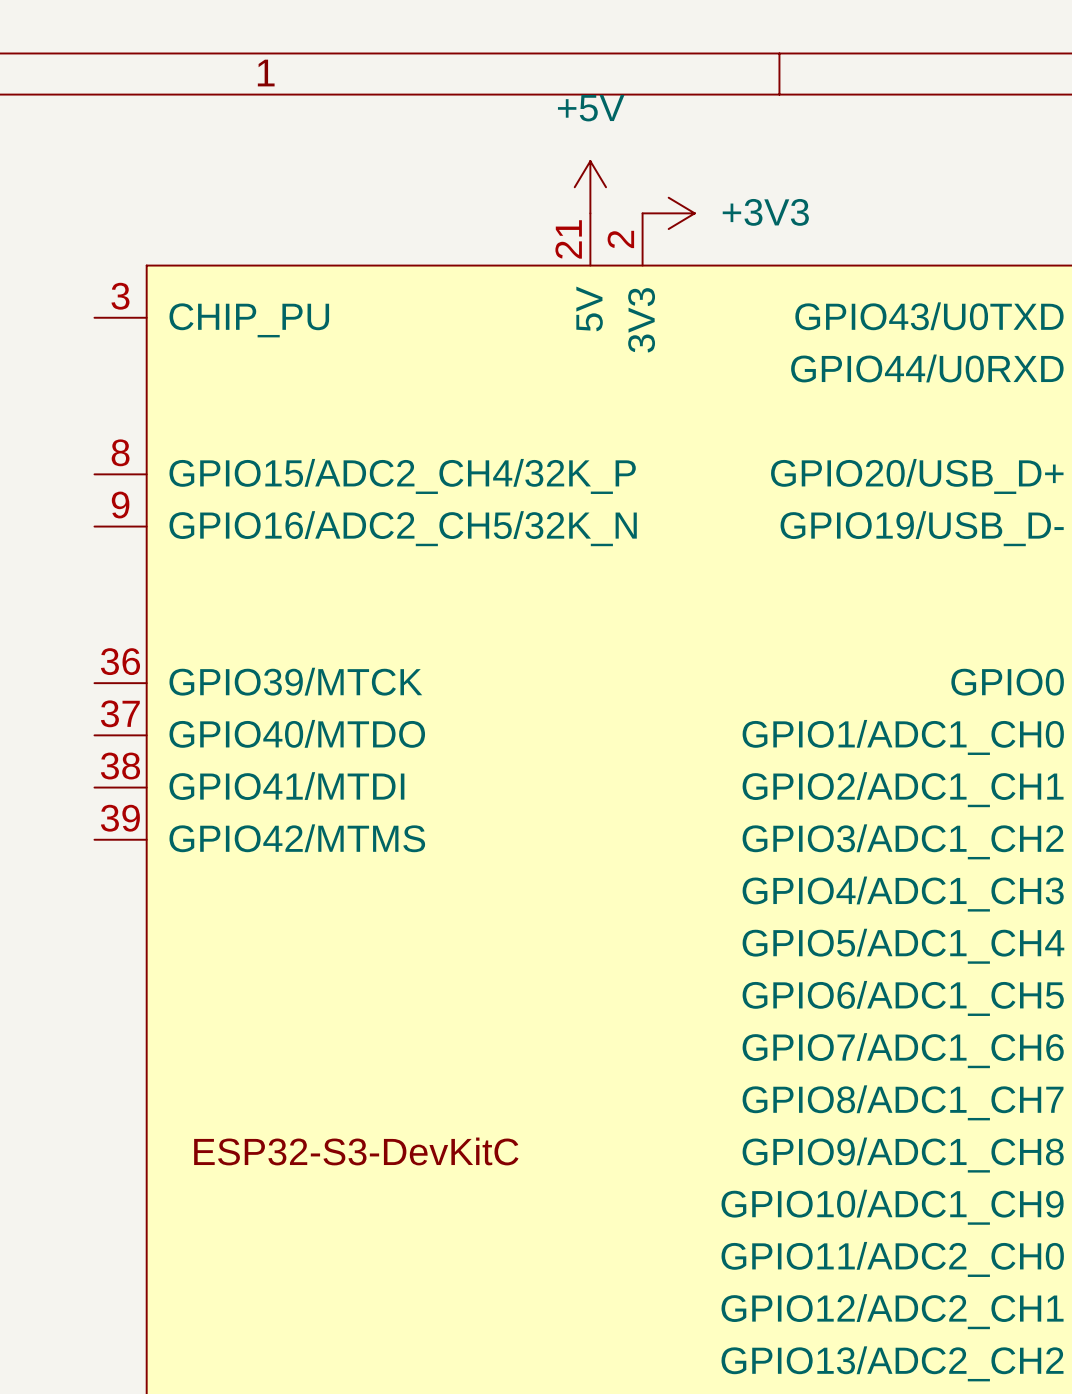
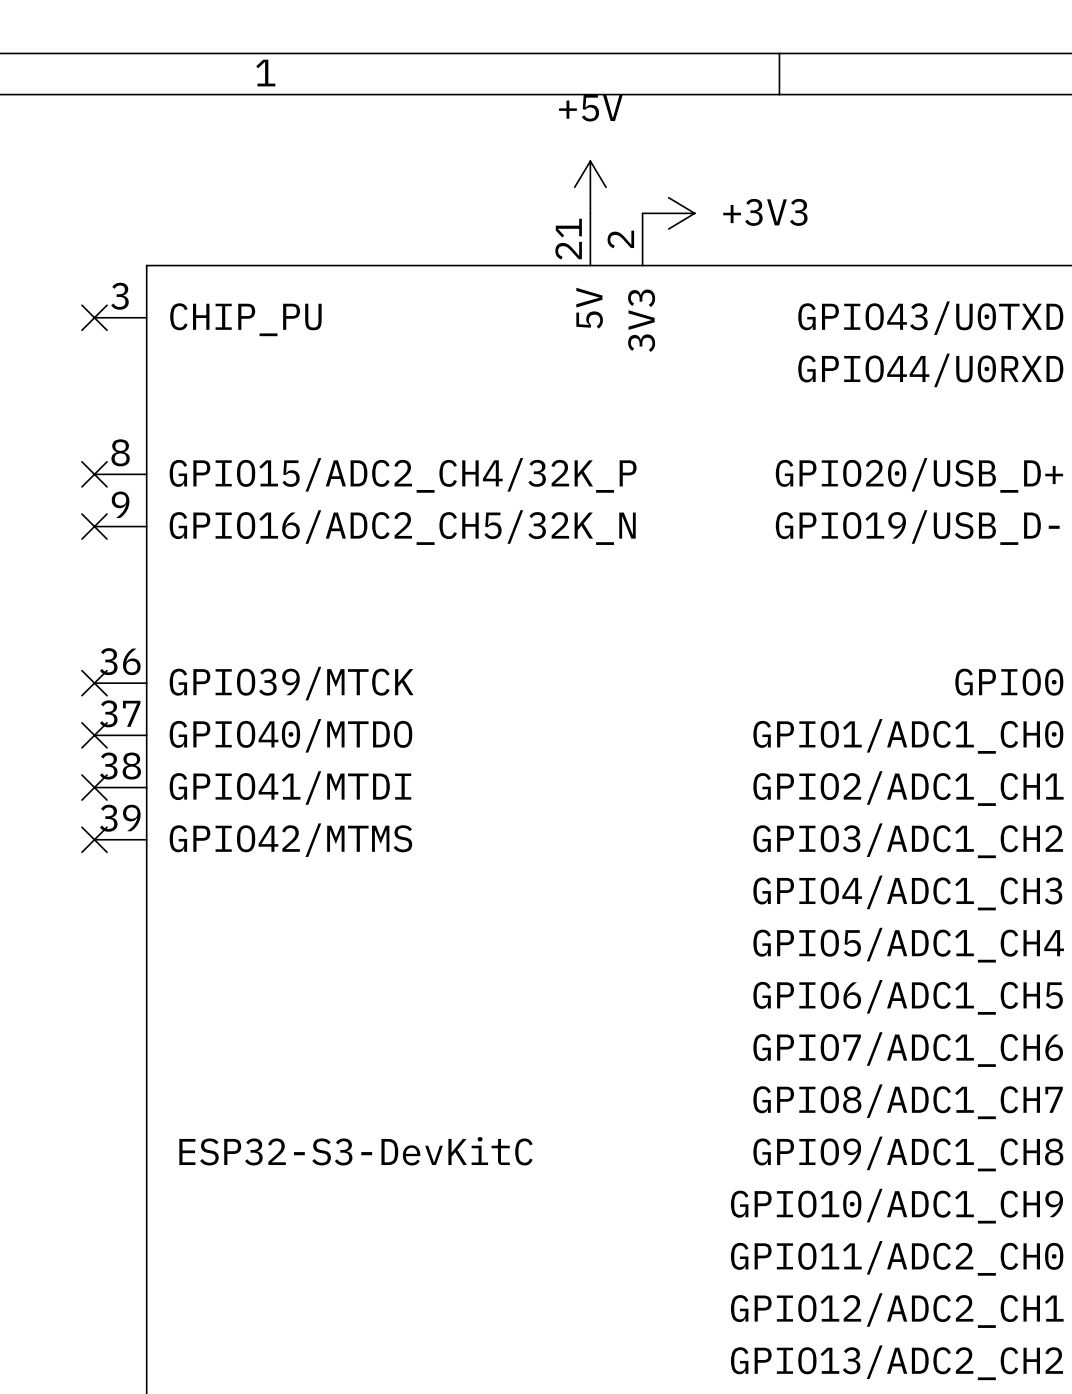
no-connect mark: none -> (94, 317)
no-connect mark: none -> (94, 474)
no-connect mark: none -> (94, 526)
no-connect mark: none -> (94, 683)
no-connect mark: none -> (94, 735)
no-connect mark: none -> (94, 787)
no-connect mark: none -> (94, 839)

